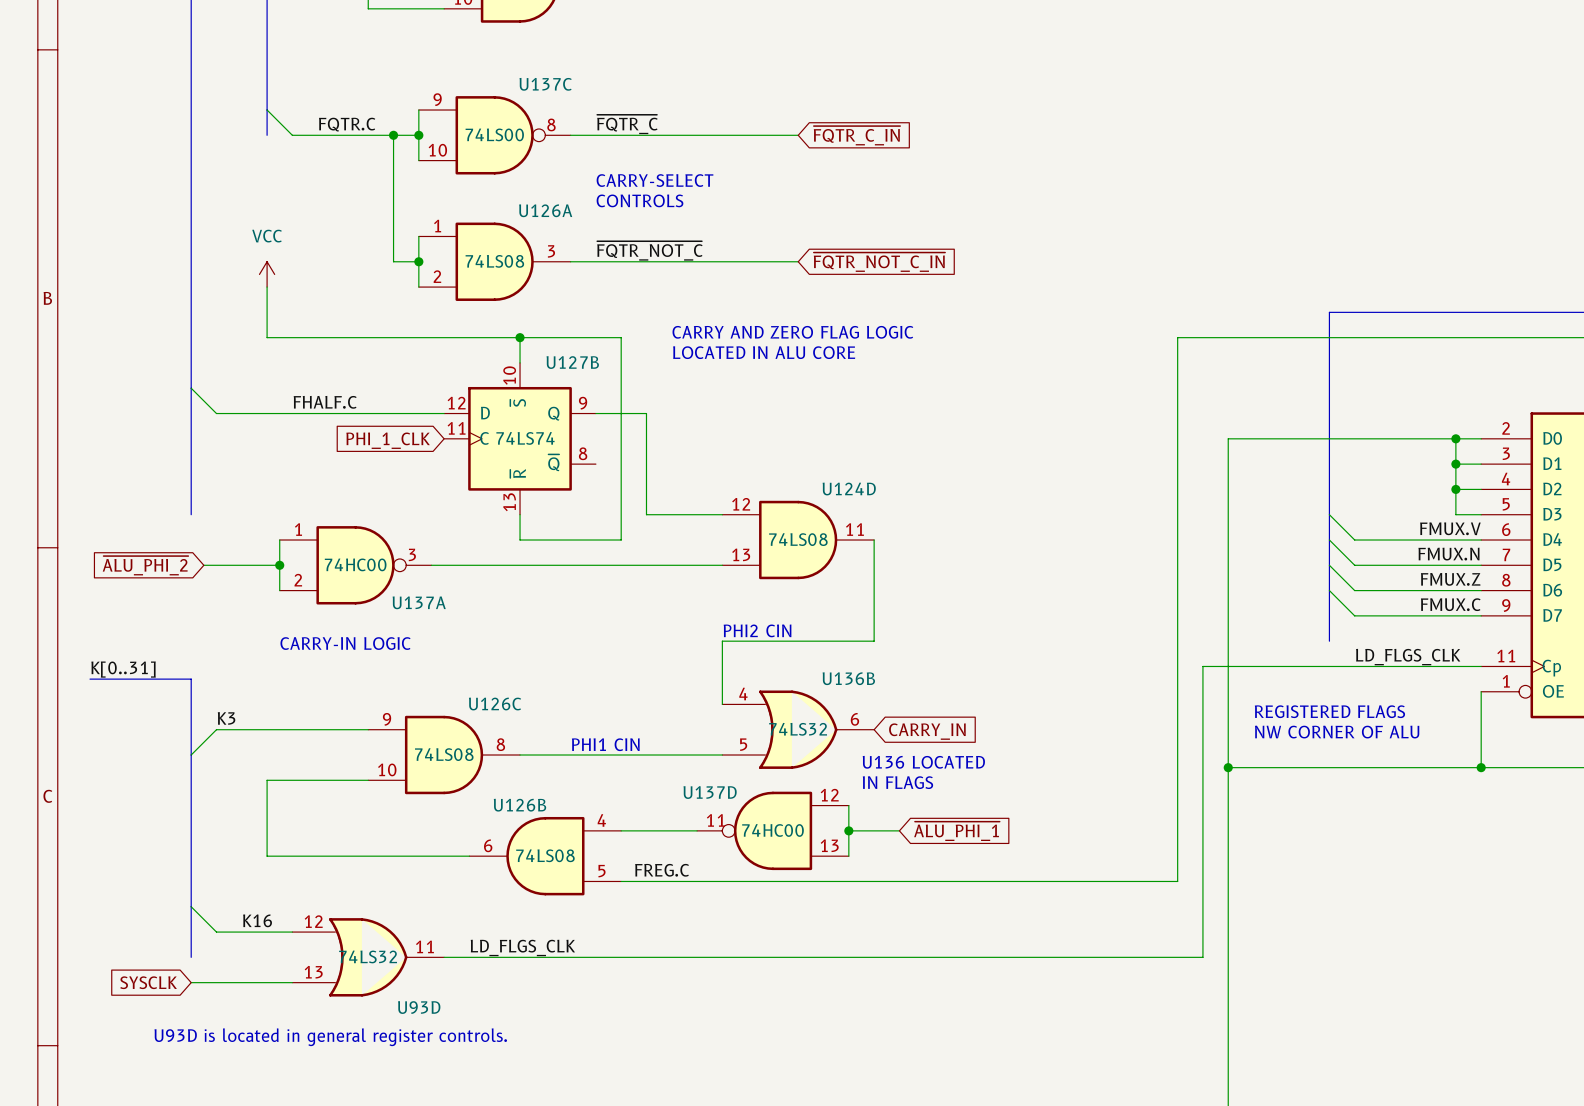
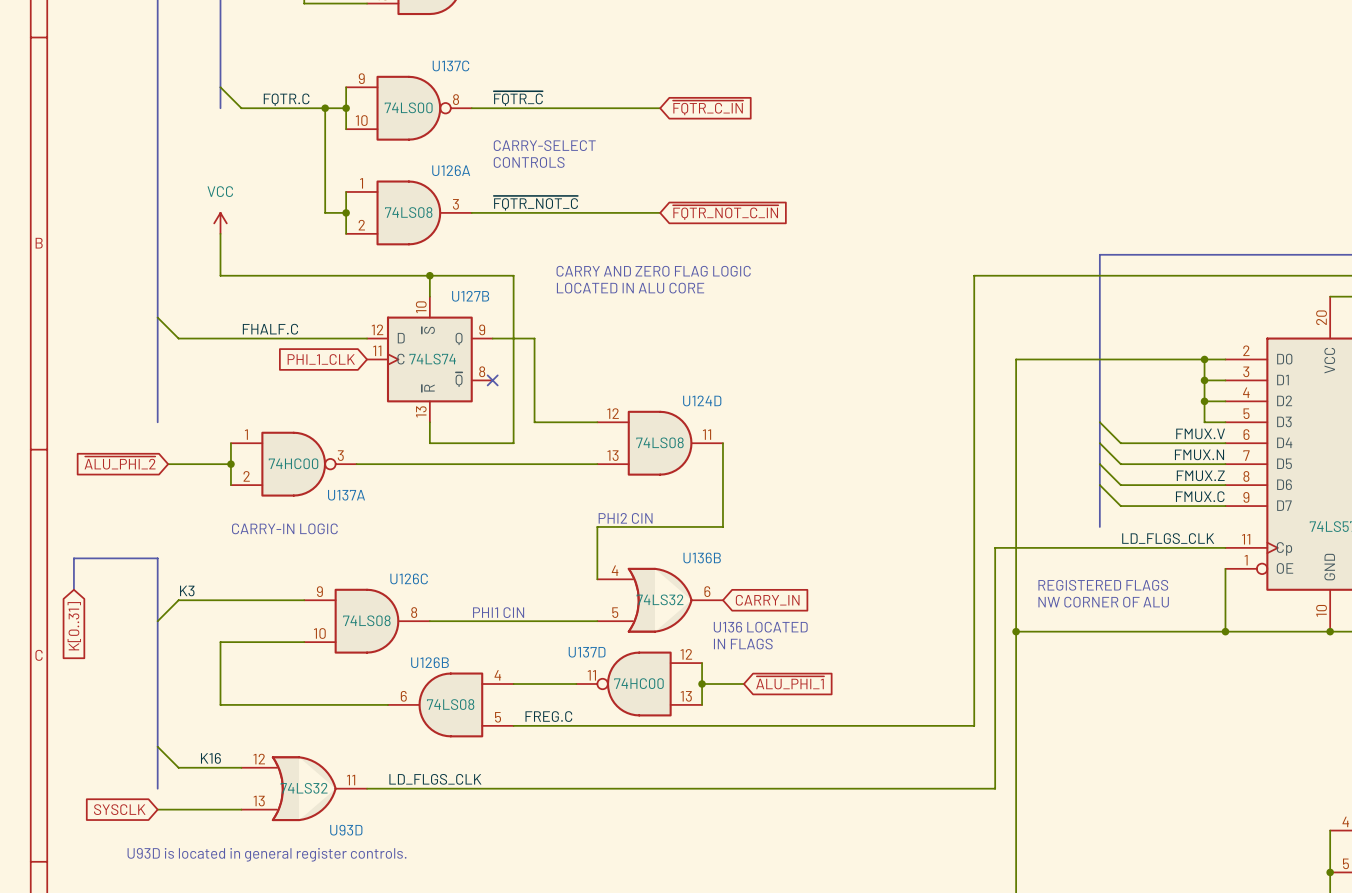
no-connect mark: none -> (492, 380)
label: K[0..31] (123, 669) -> none
bus: none -> (73, 558) (73, 589)
global label: none -> K[0..31] (74, 626)

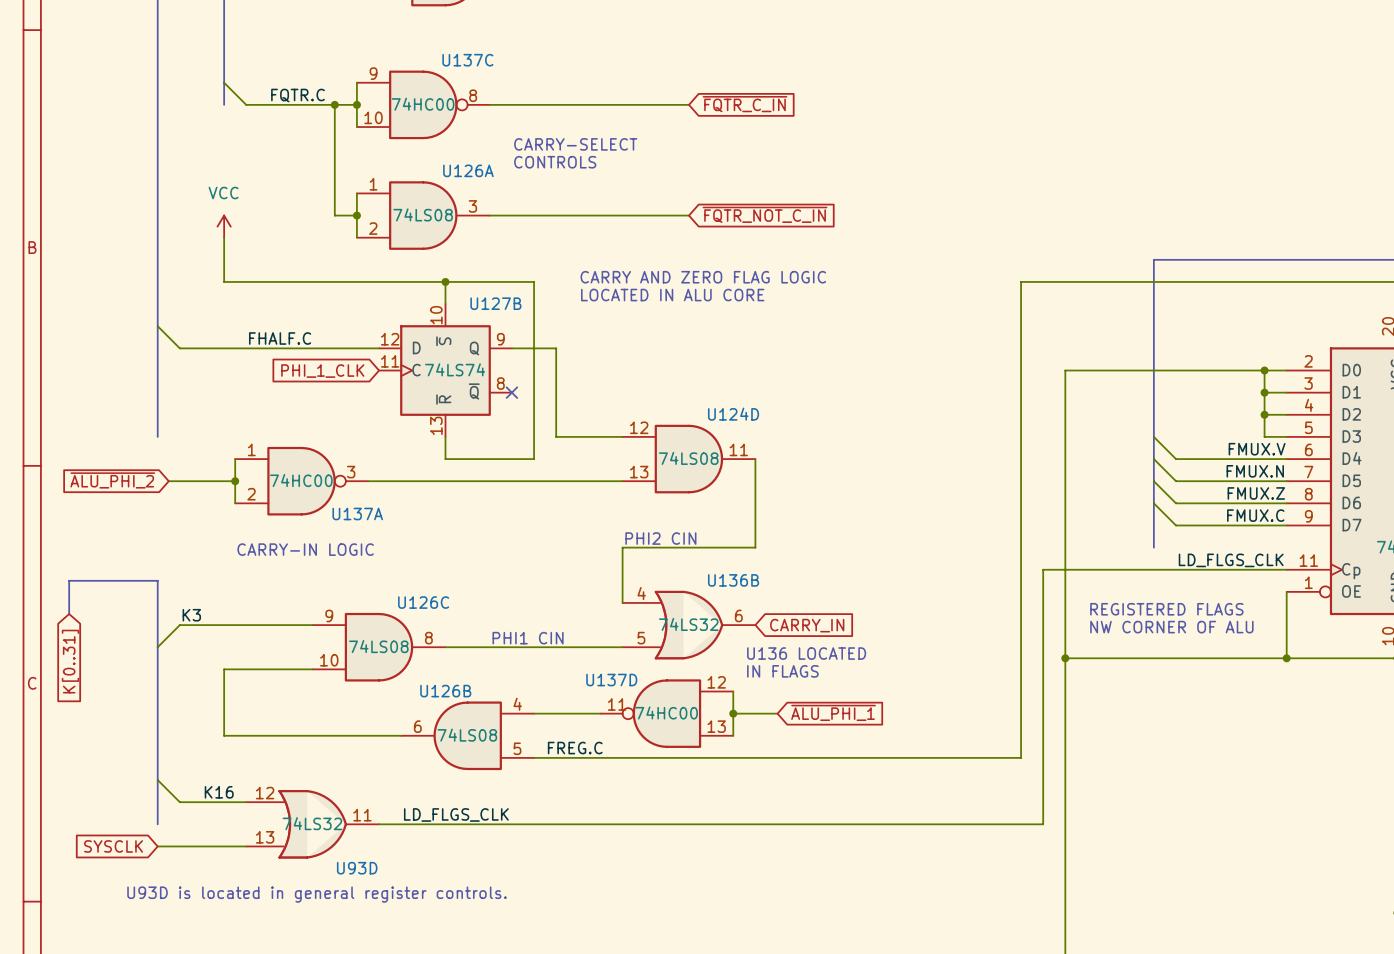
label: ~{FQTR_C} (518, 98) -> none
U137C value: 74LS00 (408, 107) -> 74HC00 (423, 104)
label: ~{FQTR_NOT_C} (535, 203) -> none

